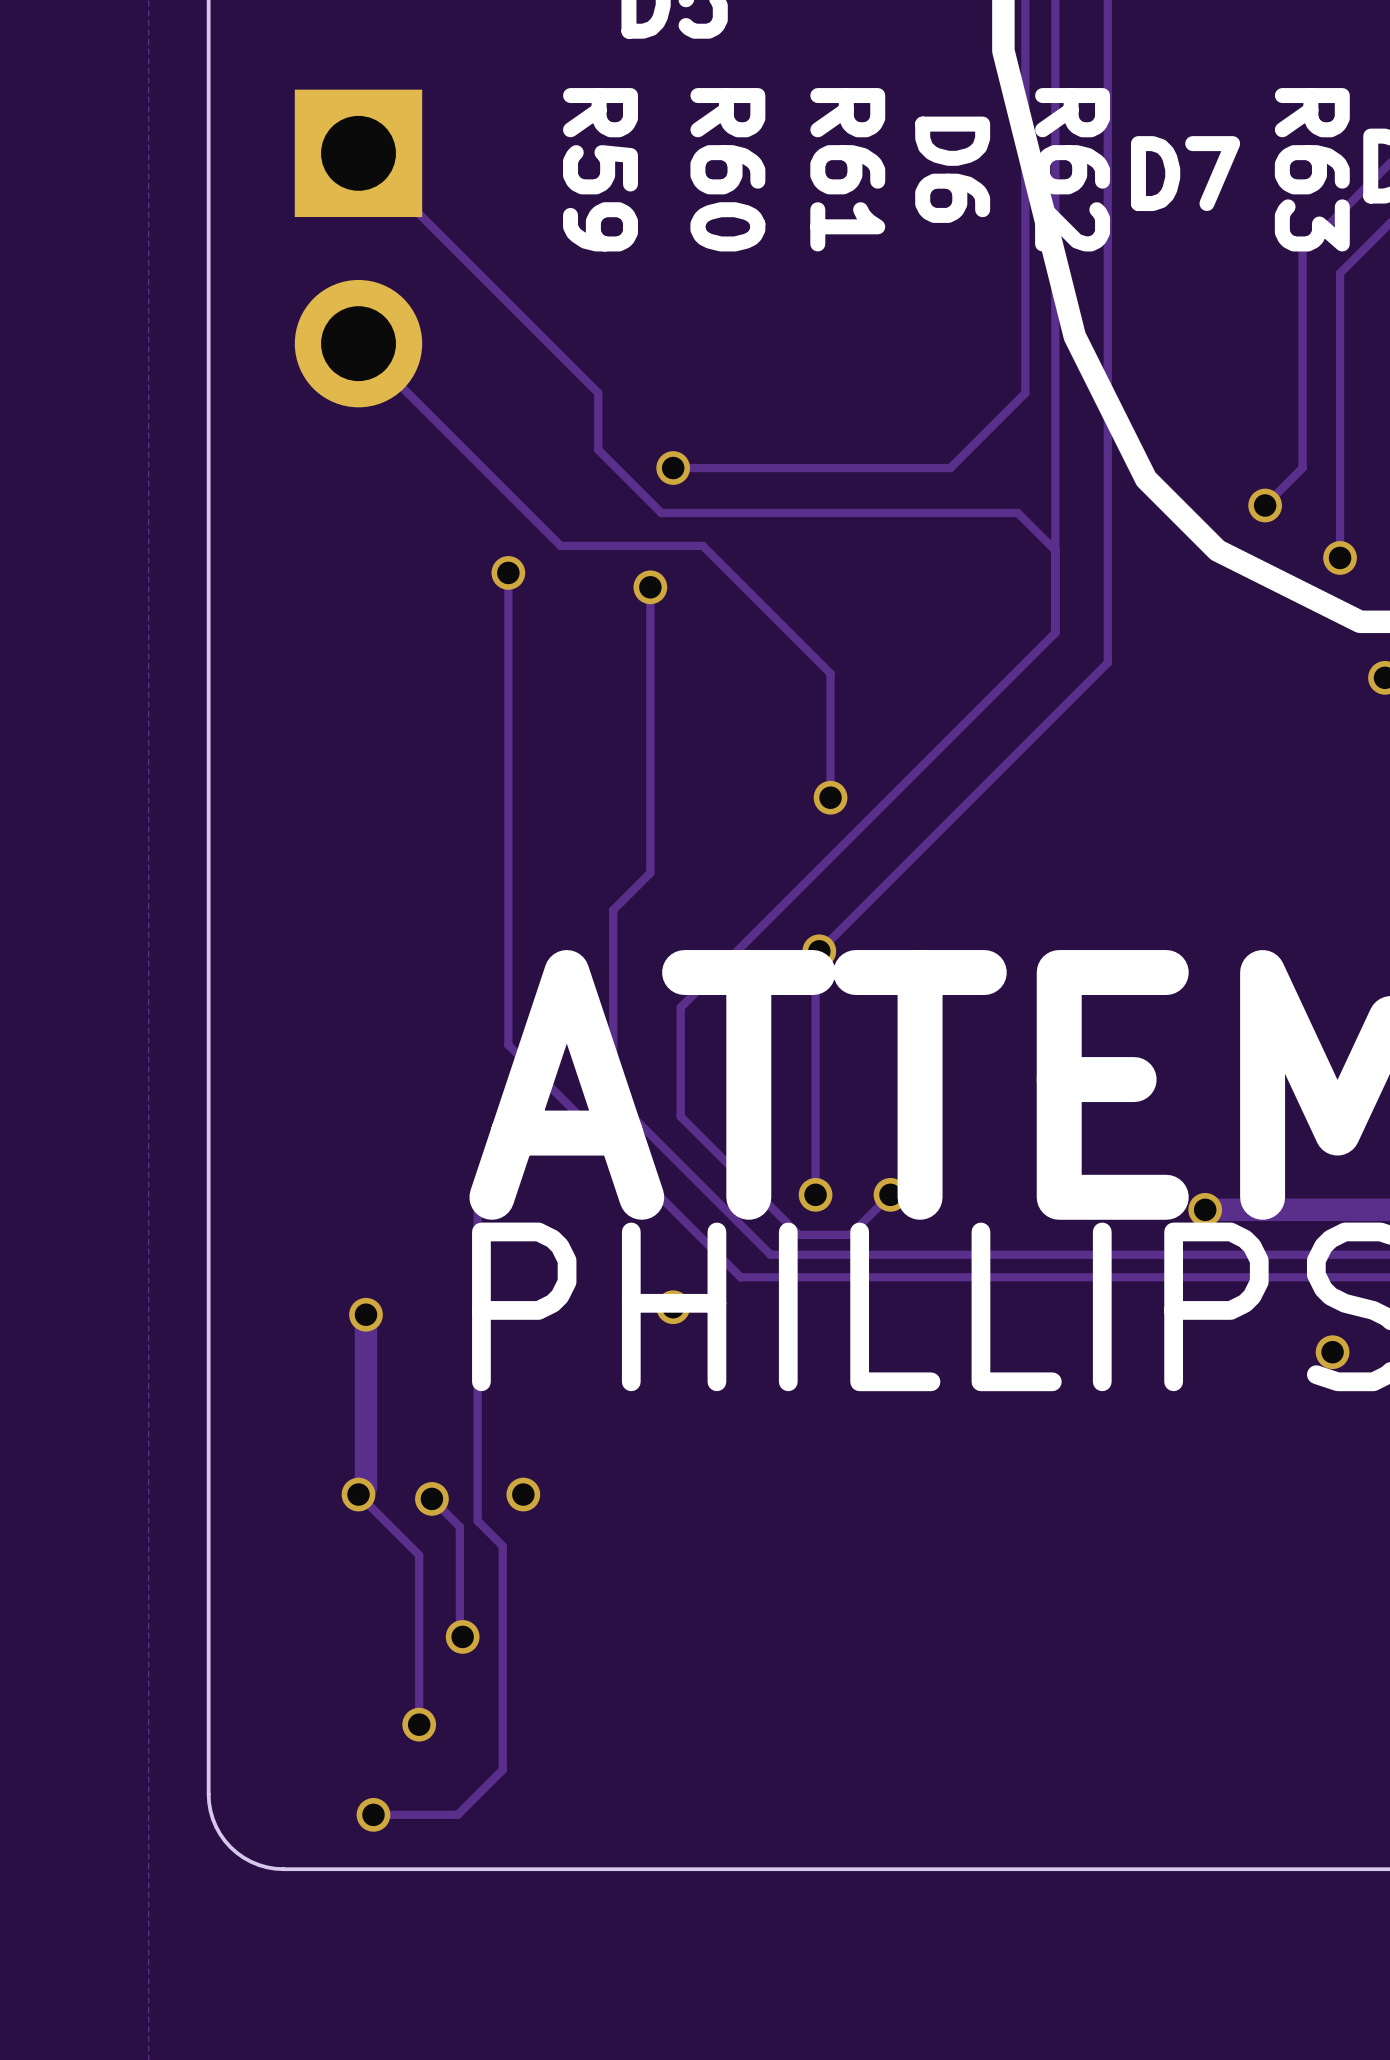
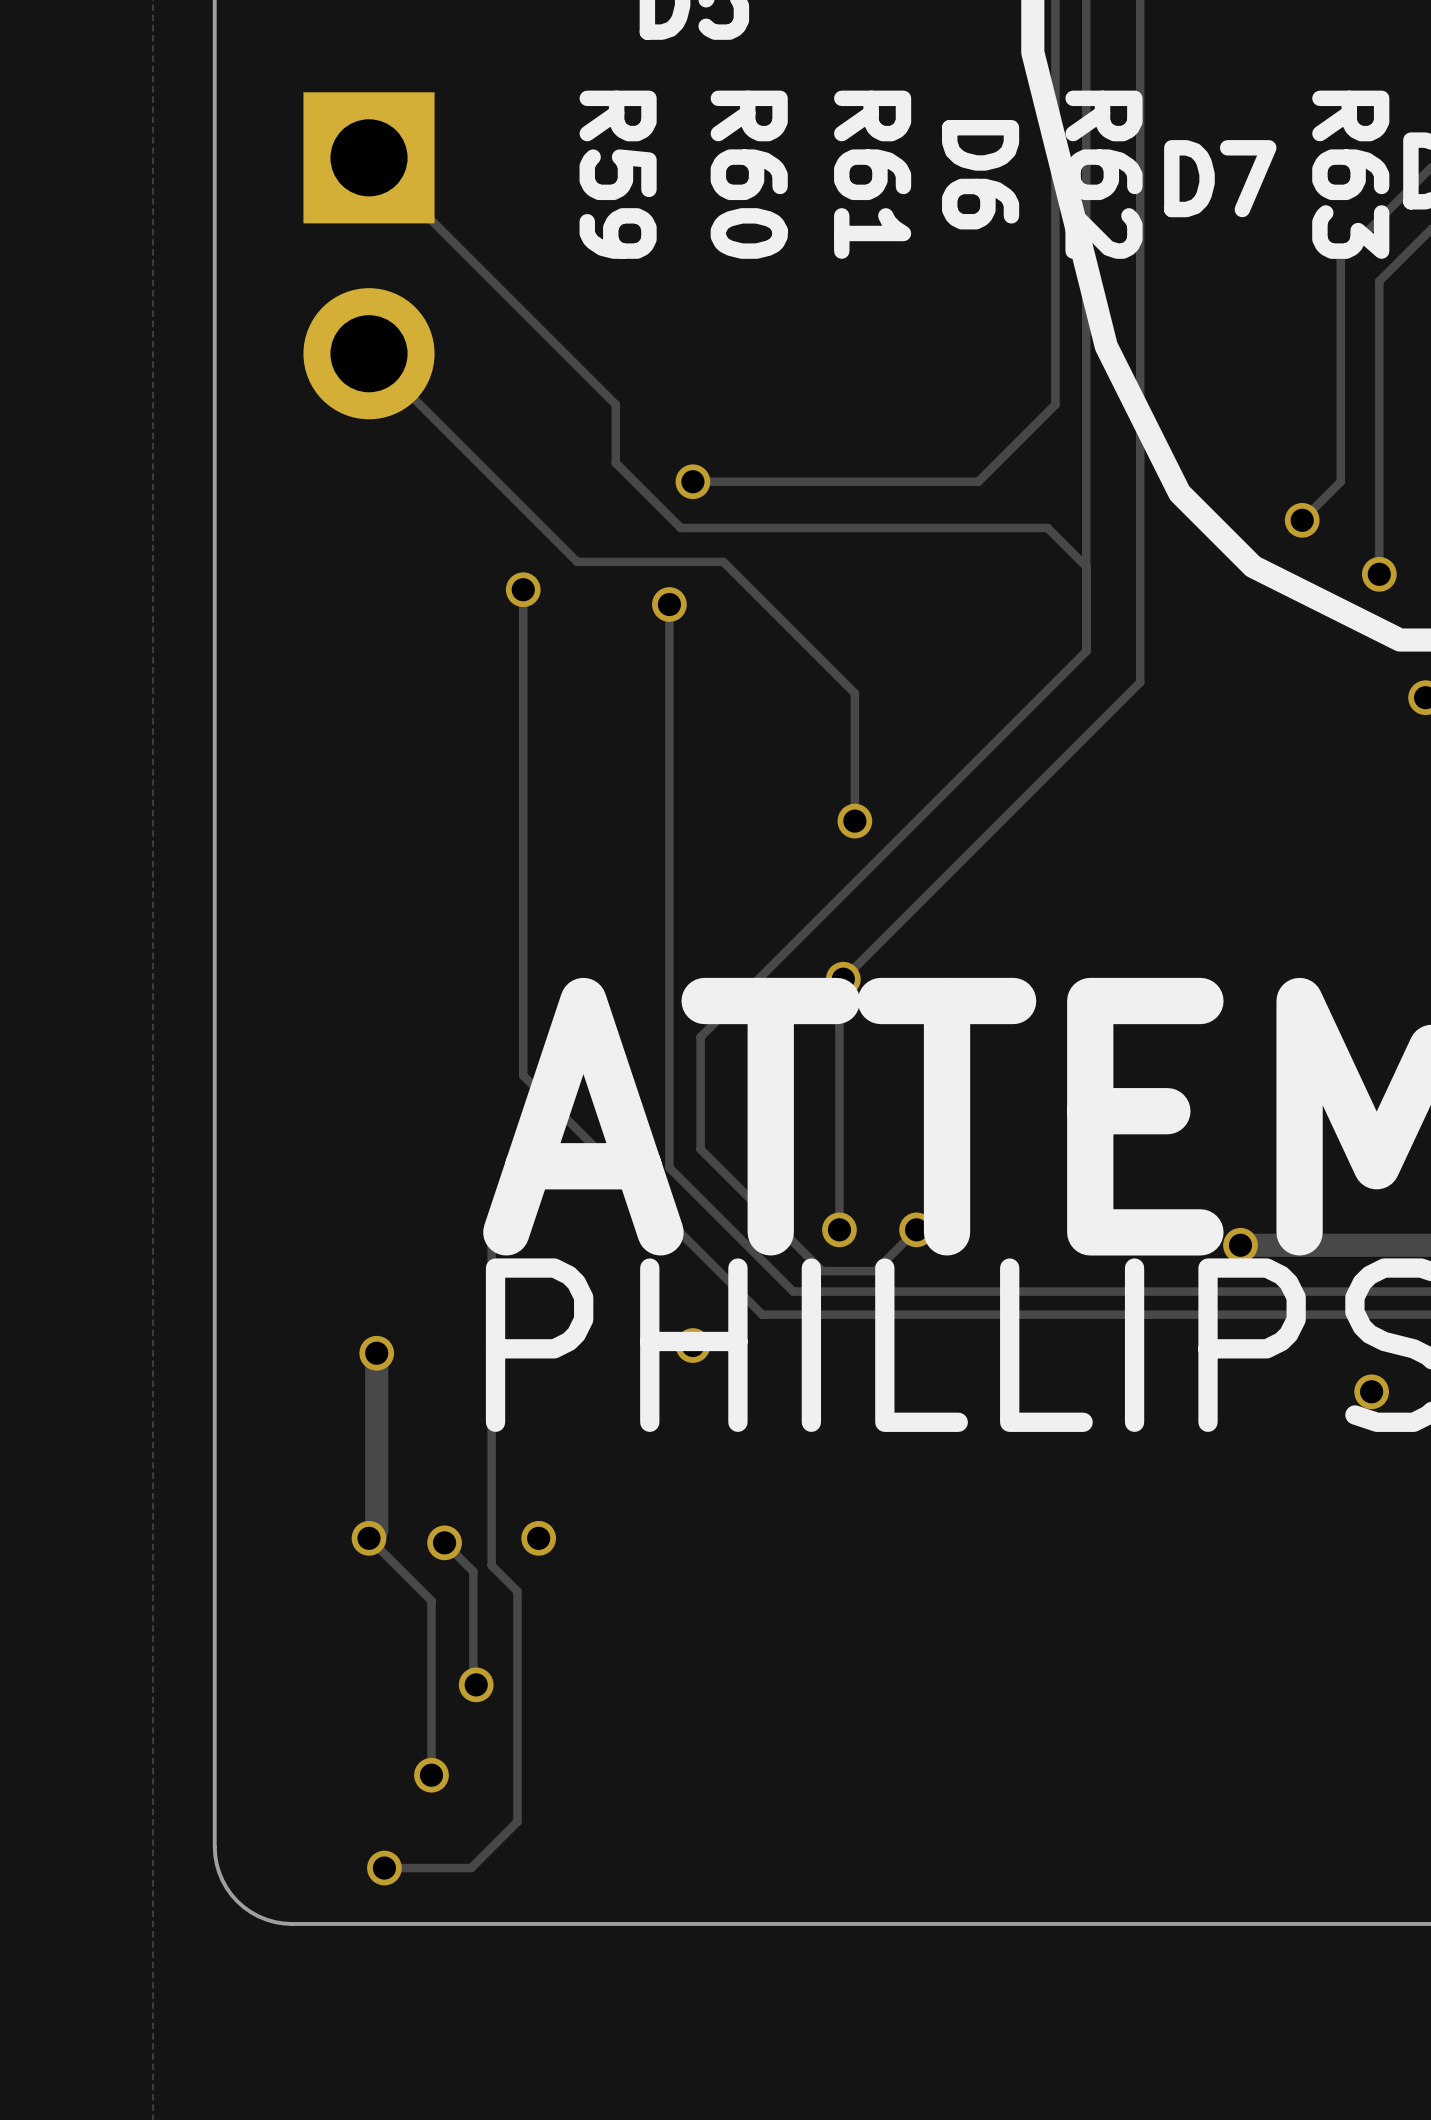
track: (650, 873) (613, 910) (613, 1097) (650, 1134) -> (669, 898) (669, 1167)

